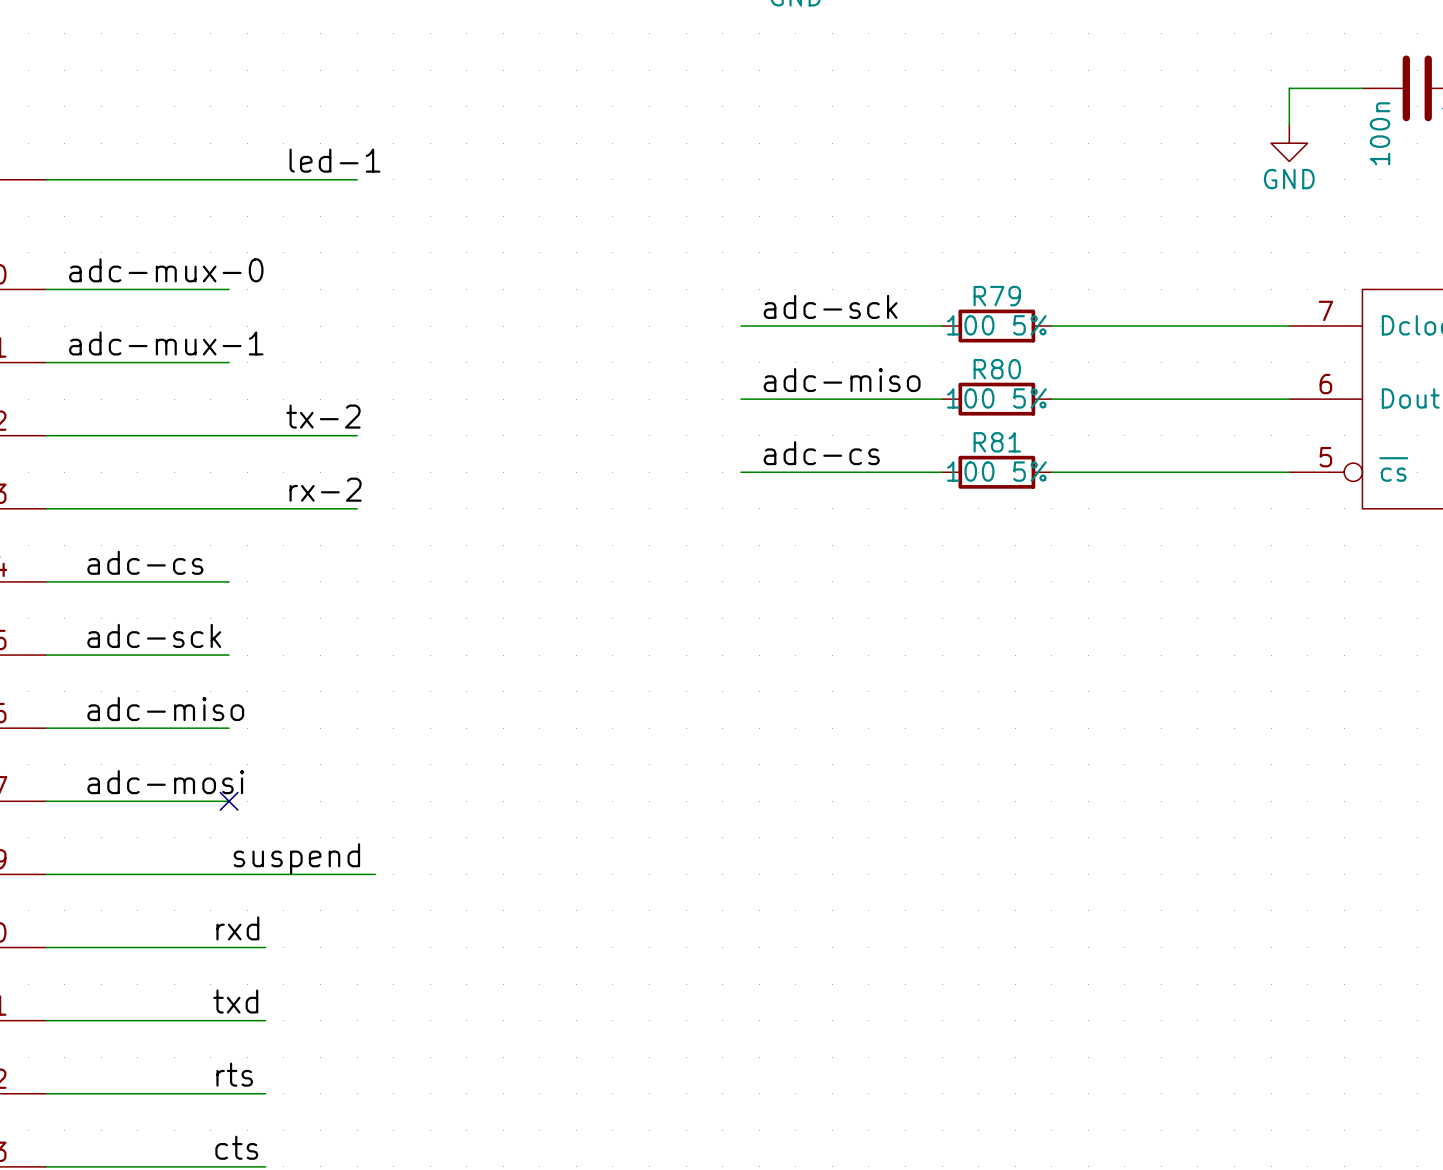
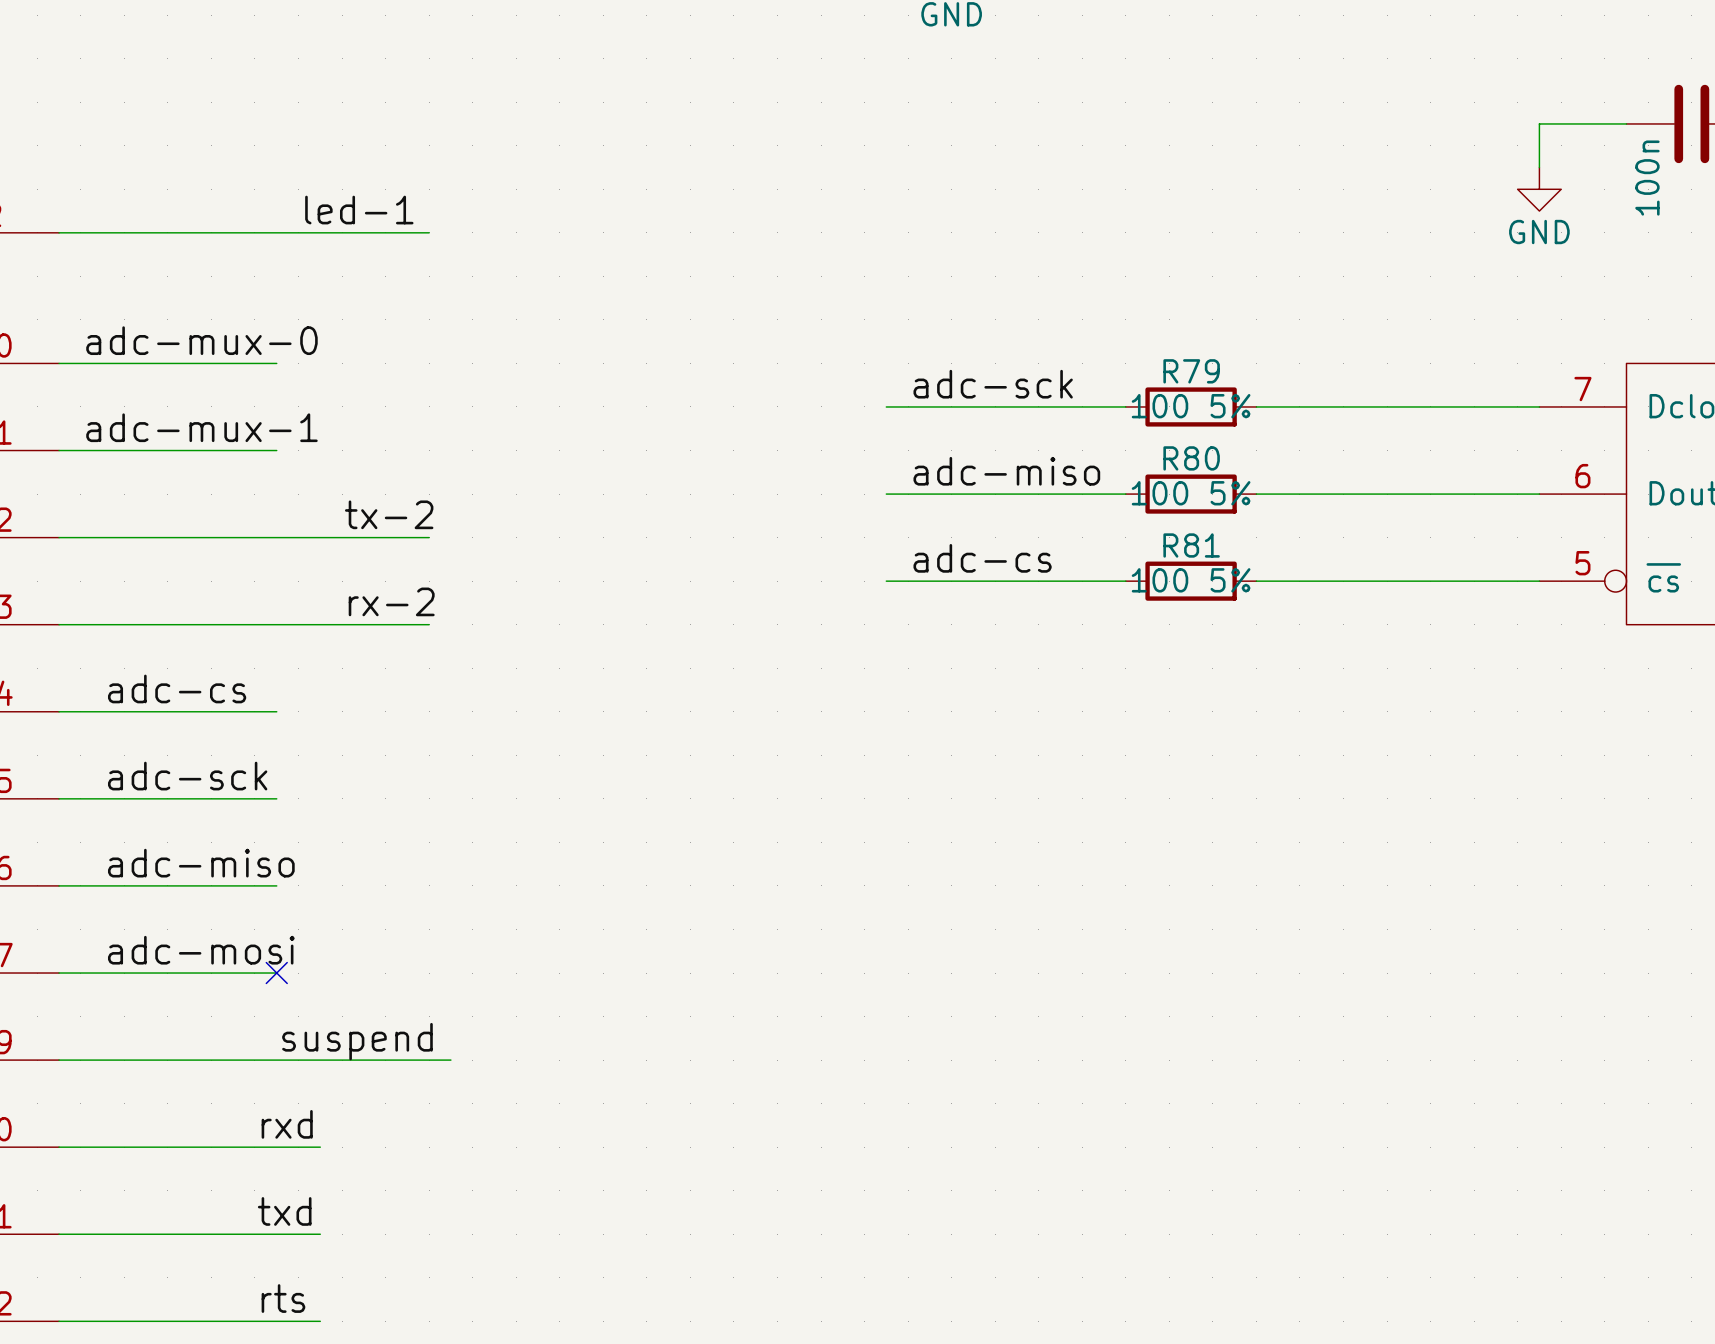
label position: led-1 (334, 160) -> led-1 (359, 210)

